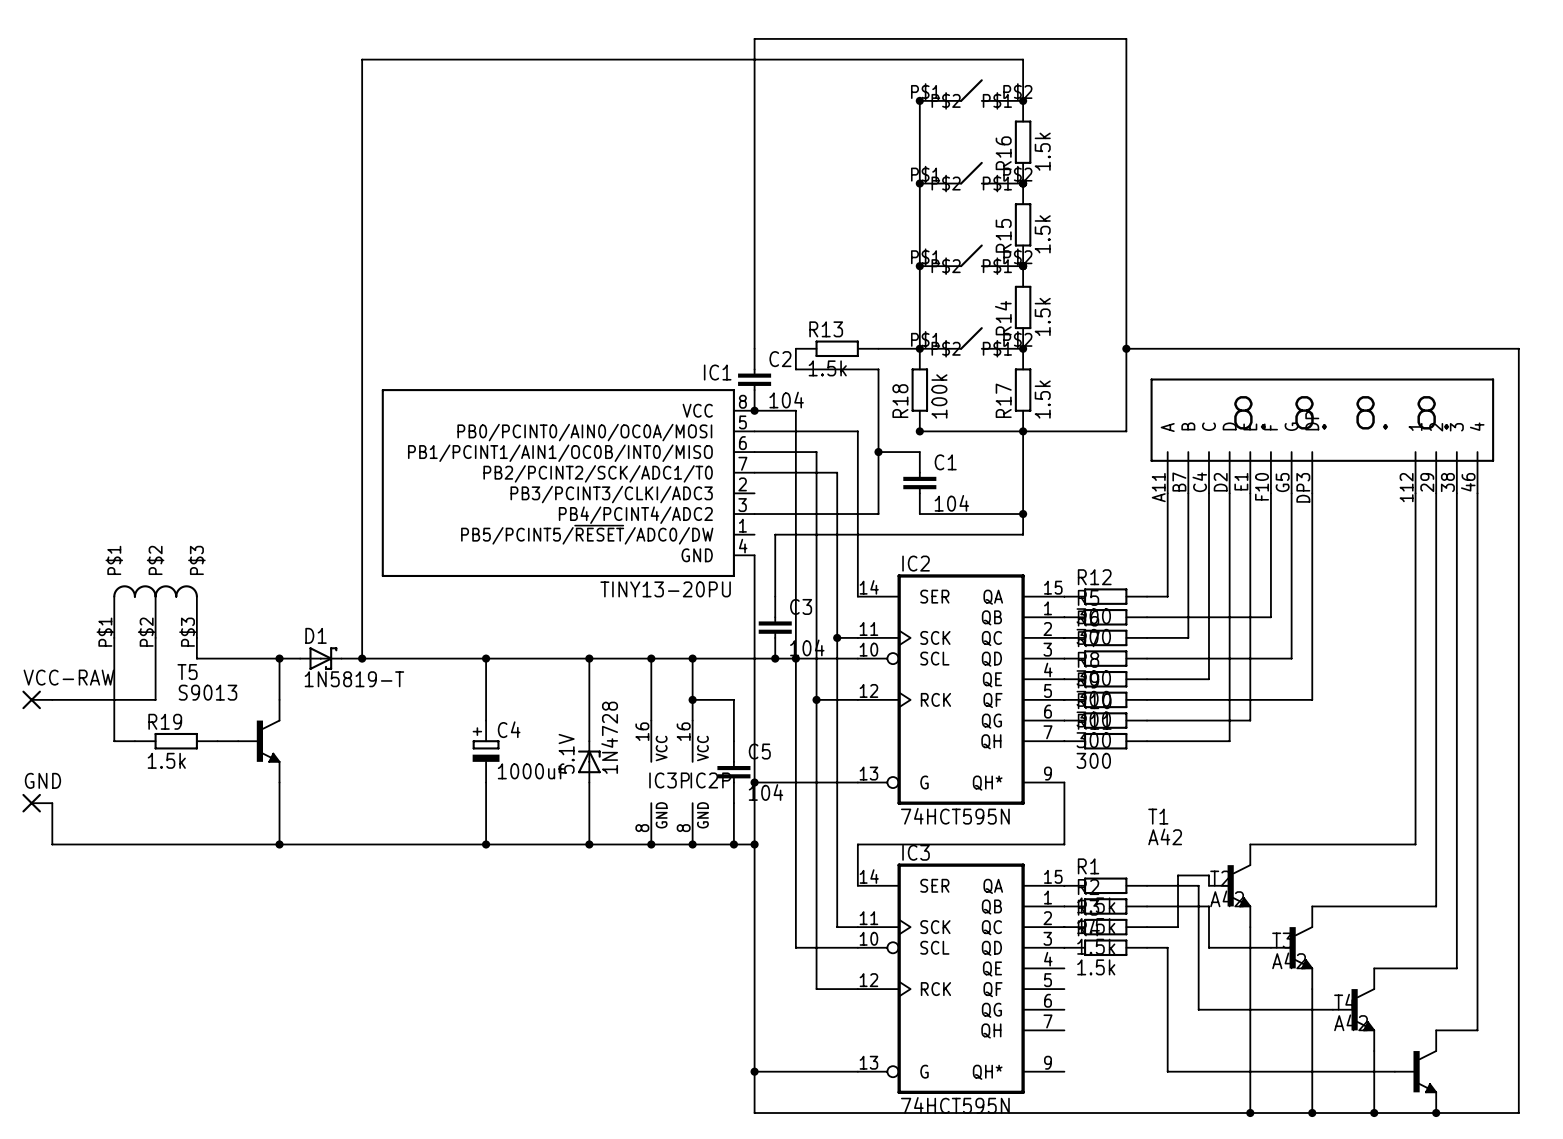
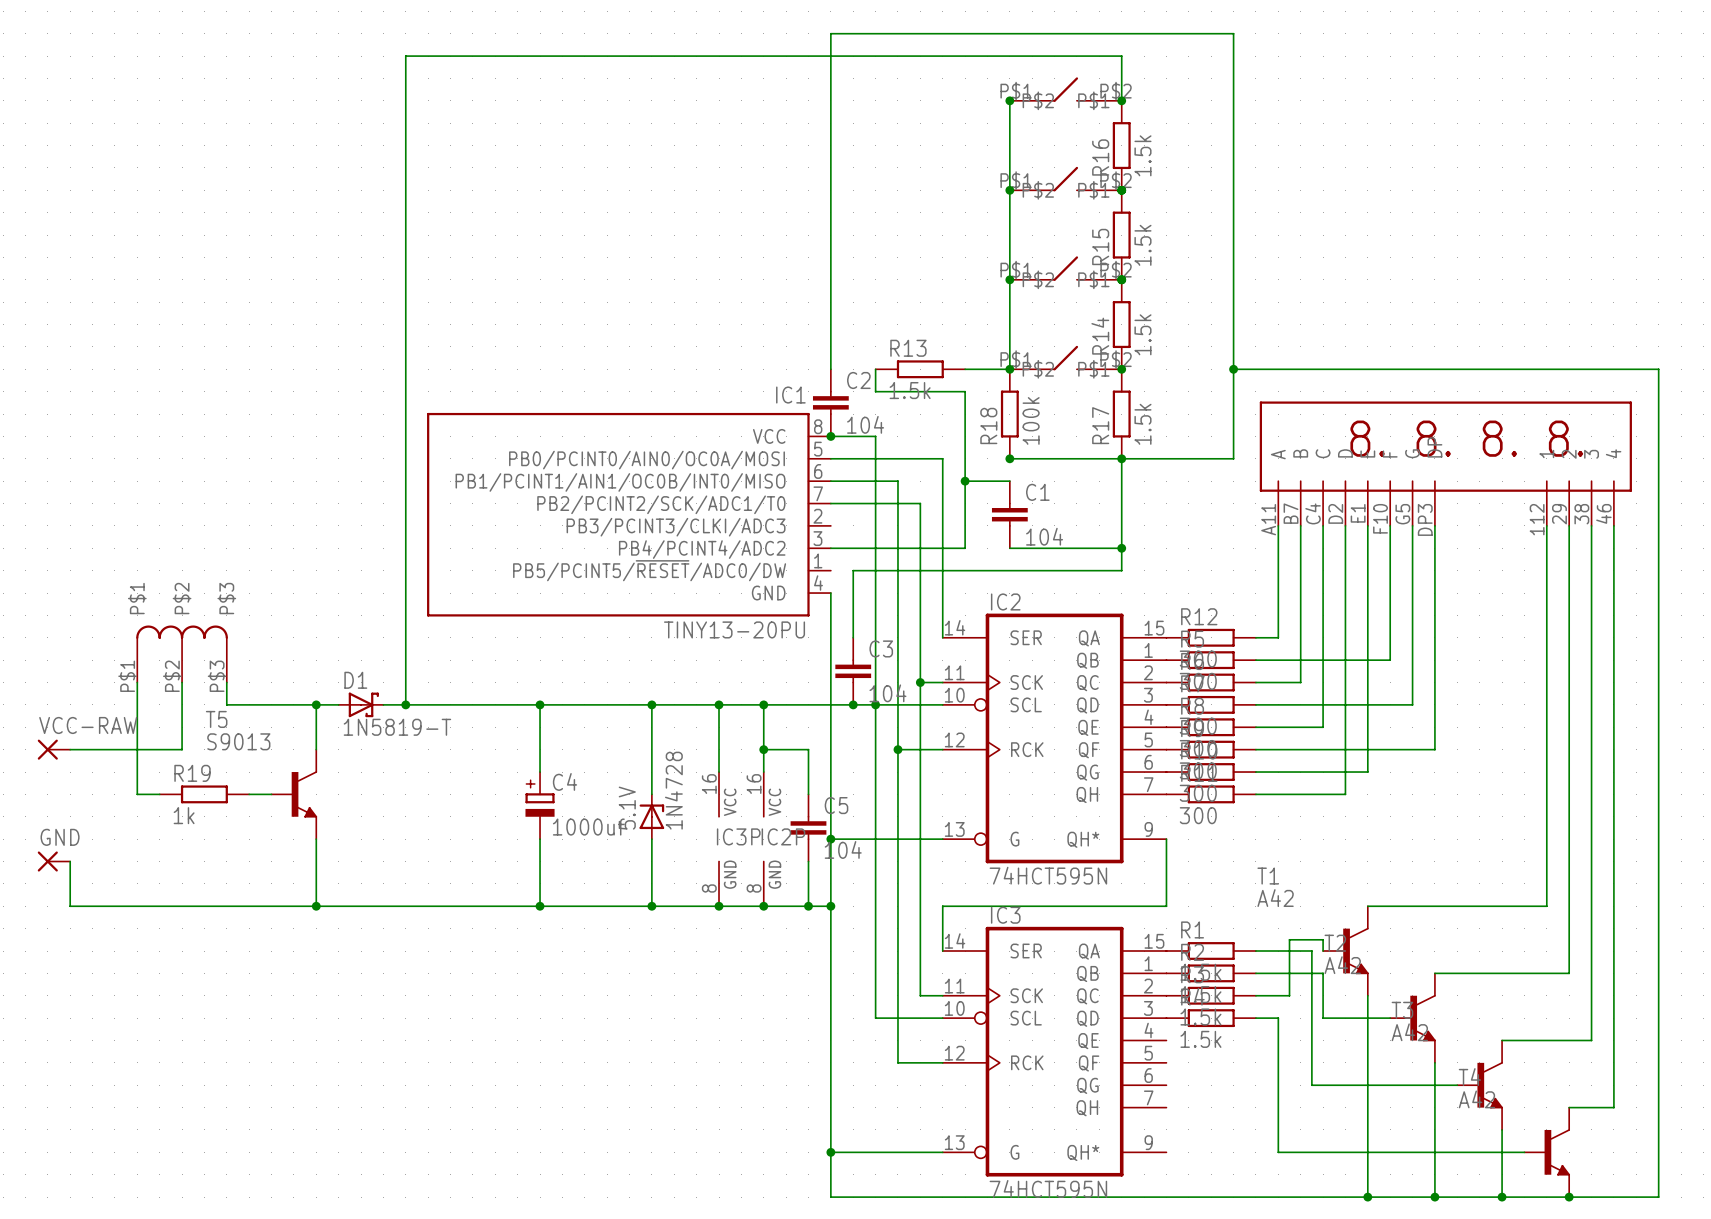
R19 value: 1.5k (166, 760) -> 1k (184, 815)

